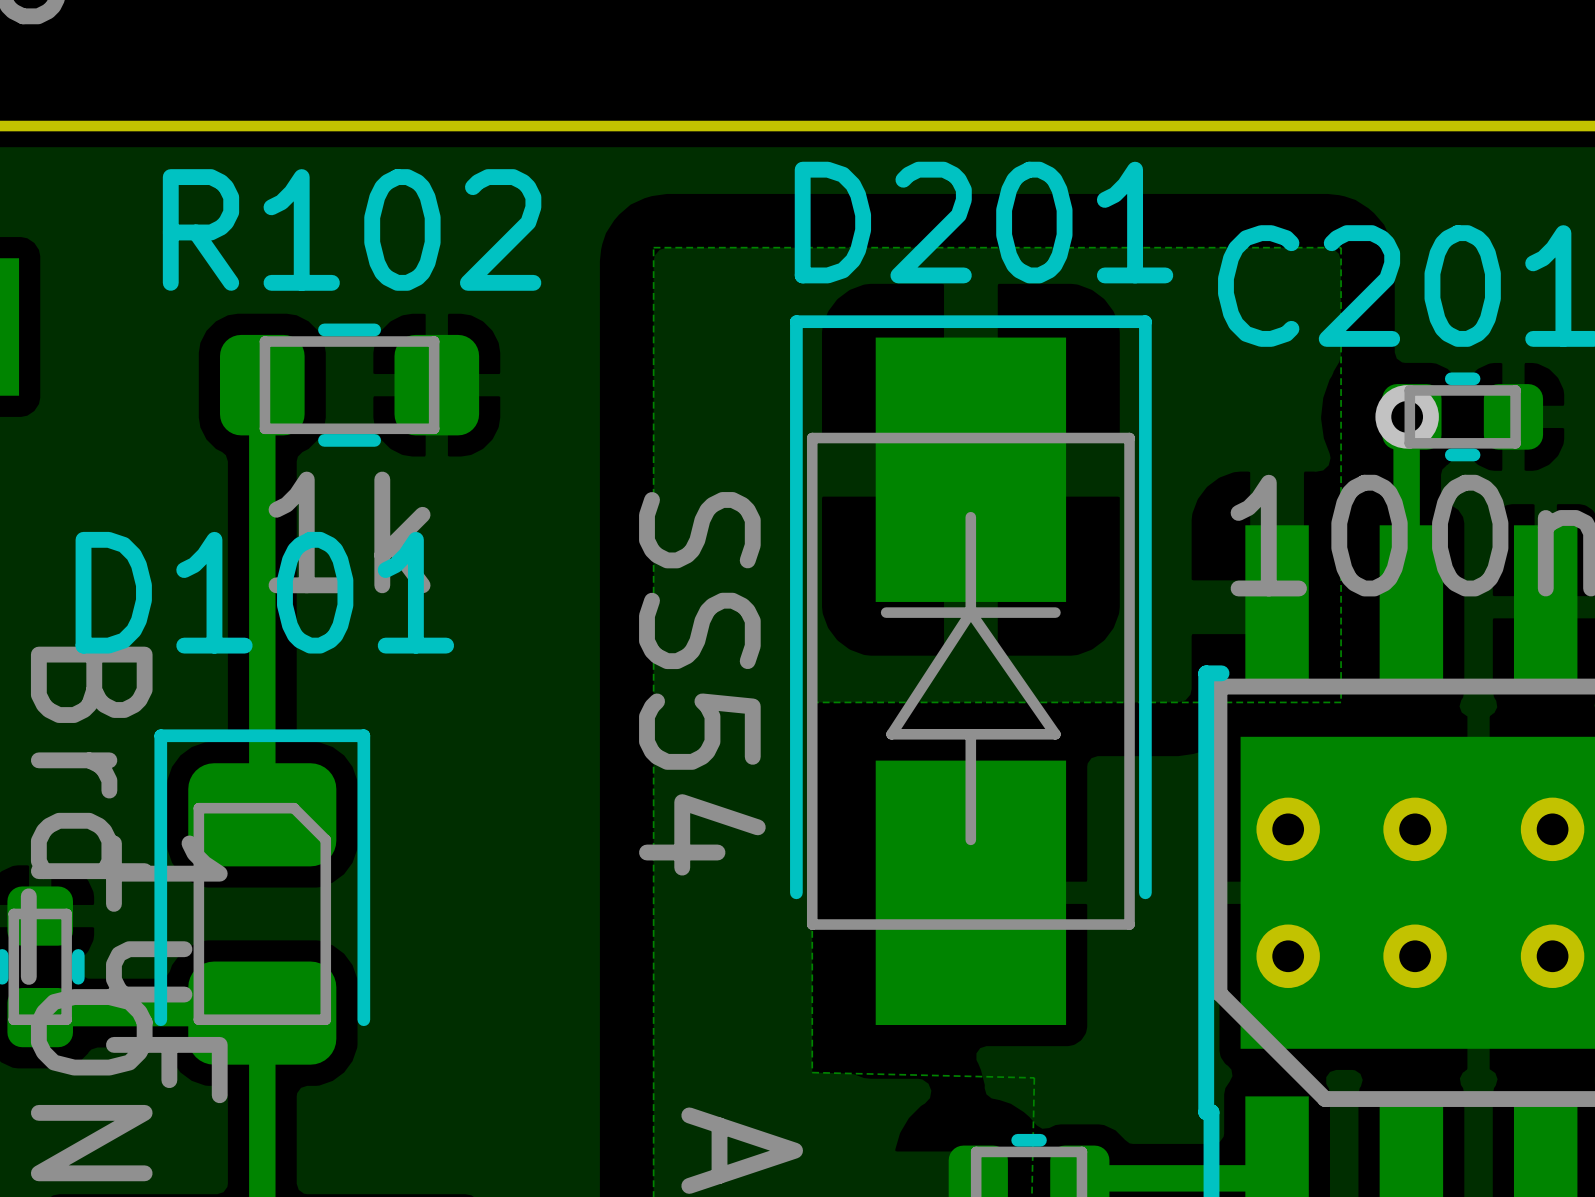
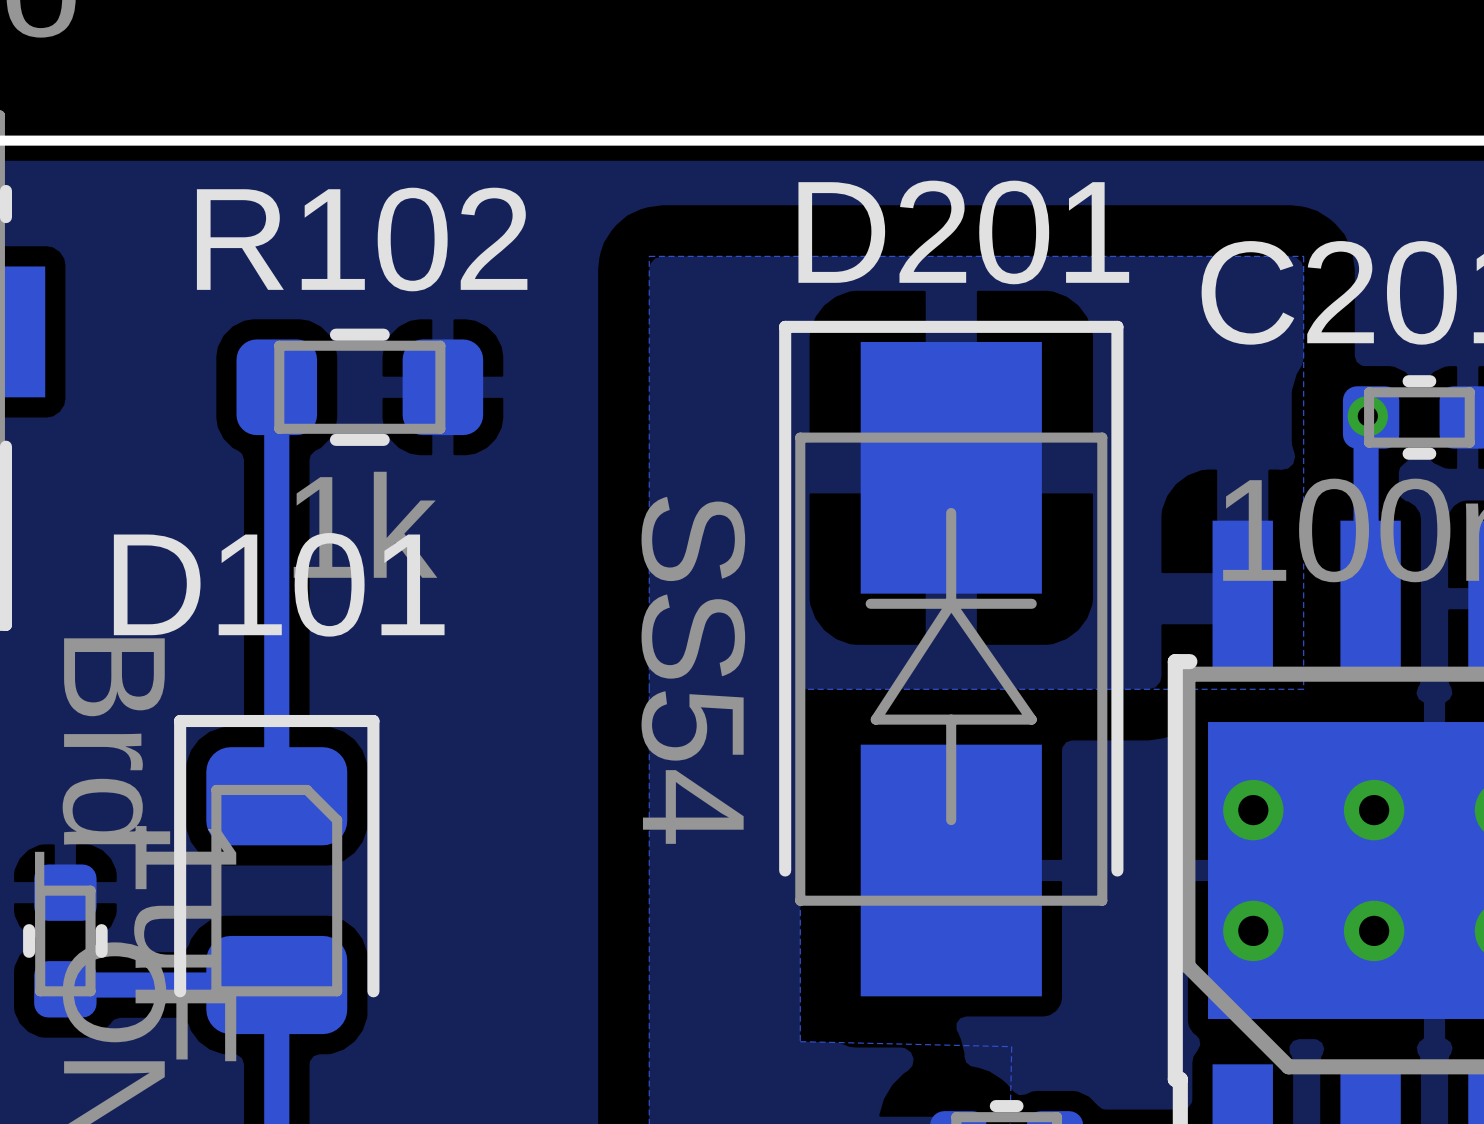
via size: [1375, 385, 1439, 449] -> [1347, 396, 1388, 437]

